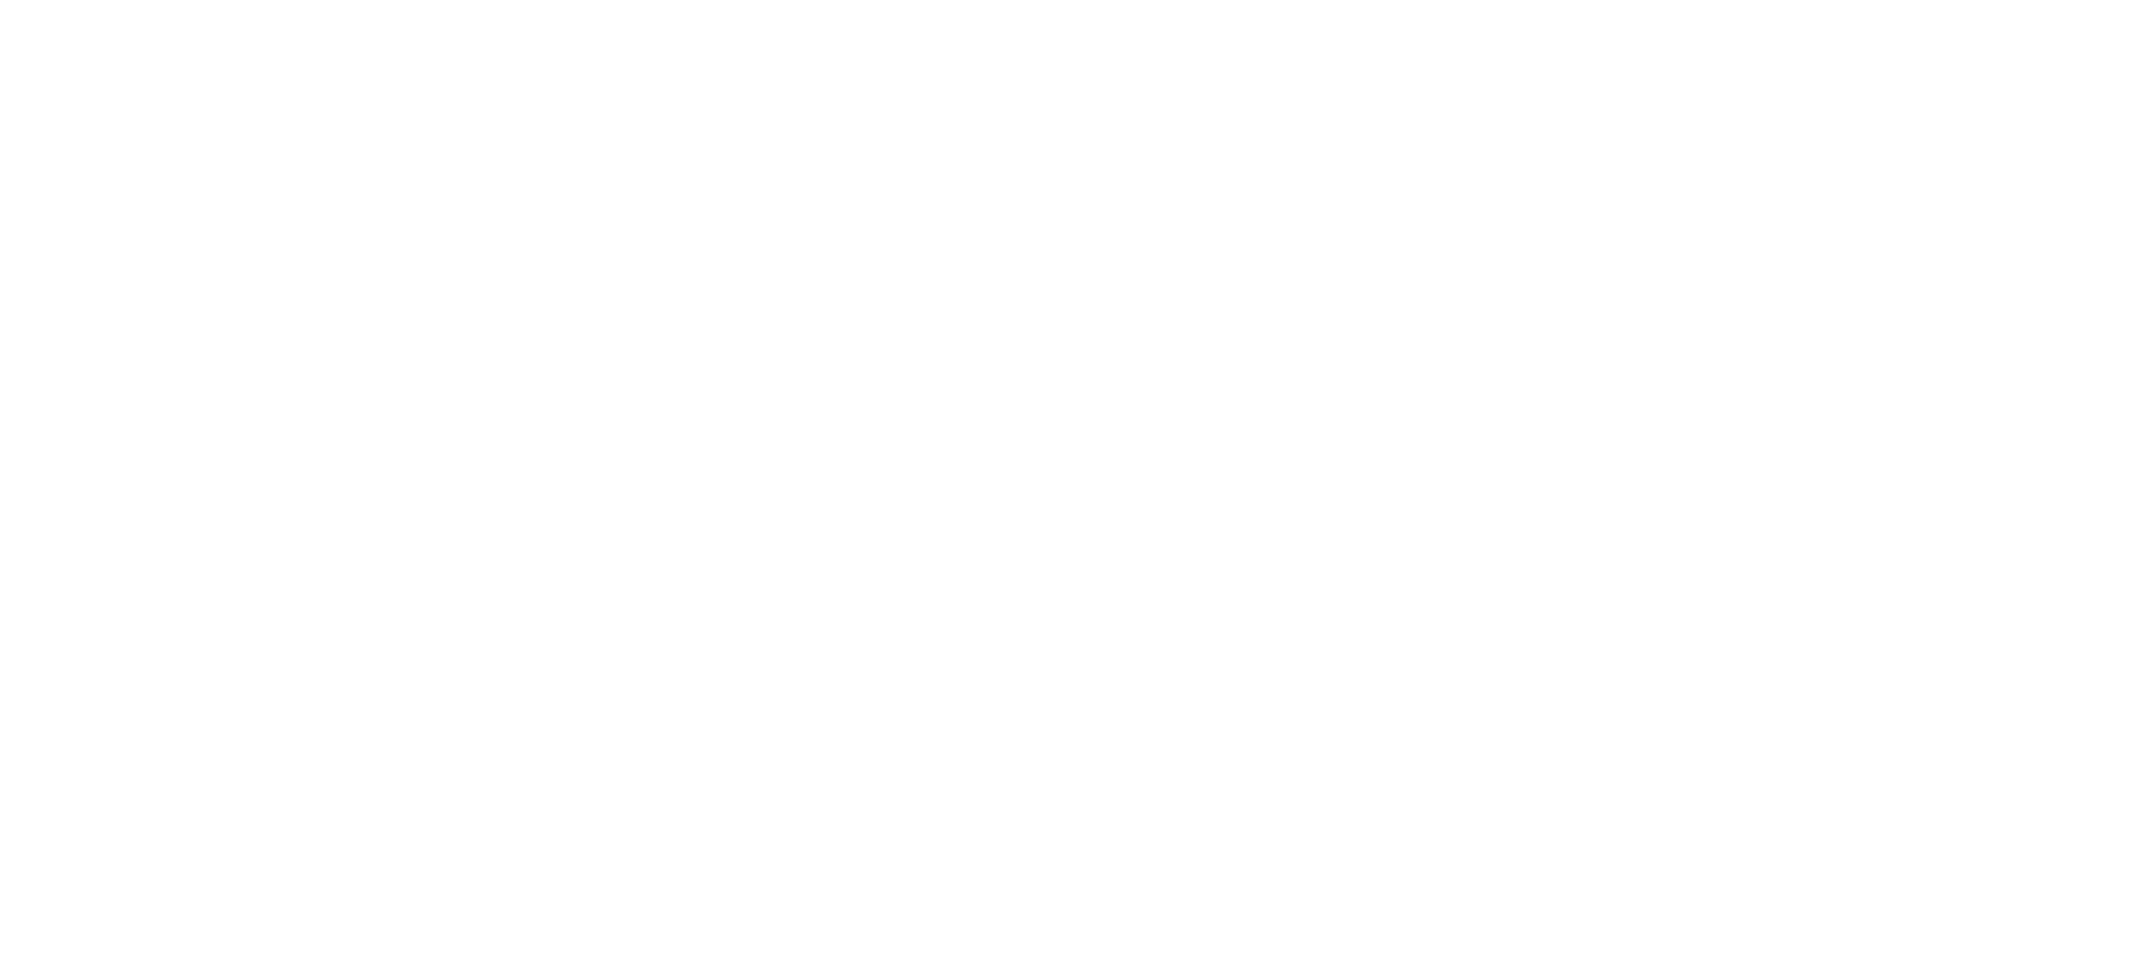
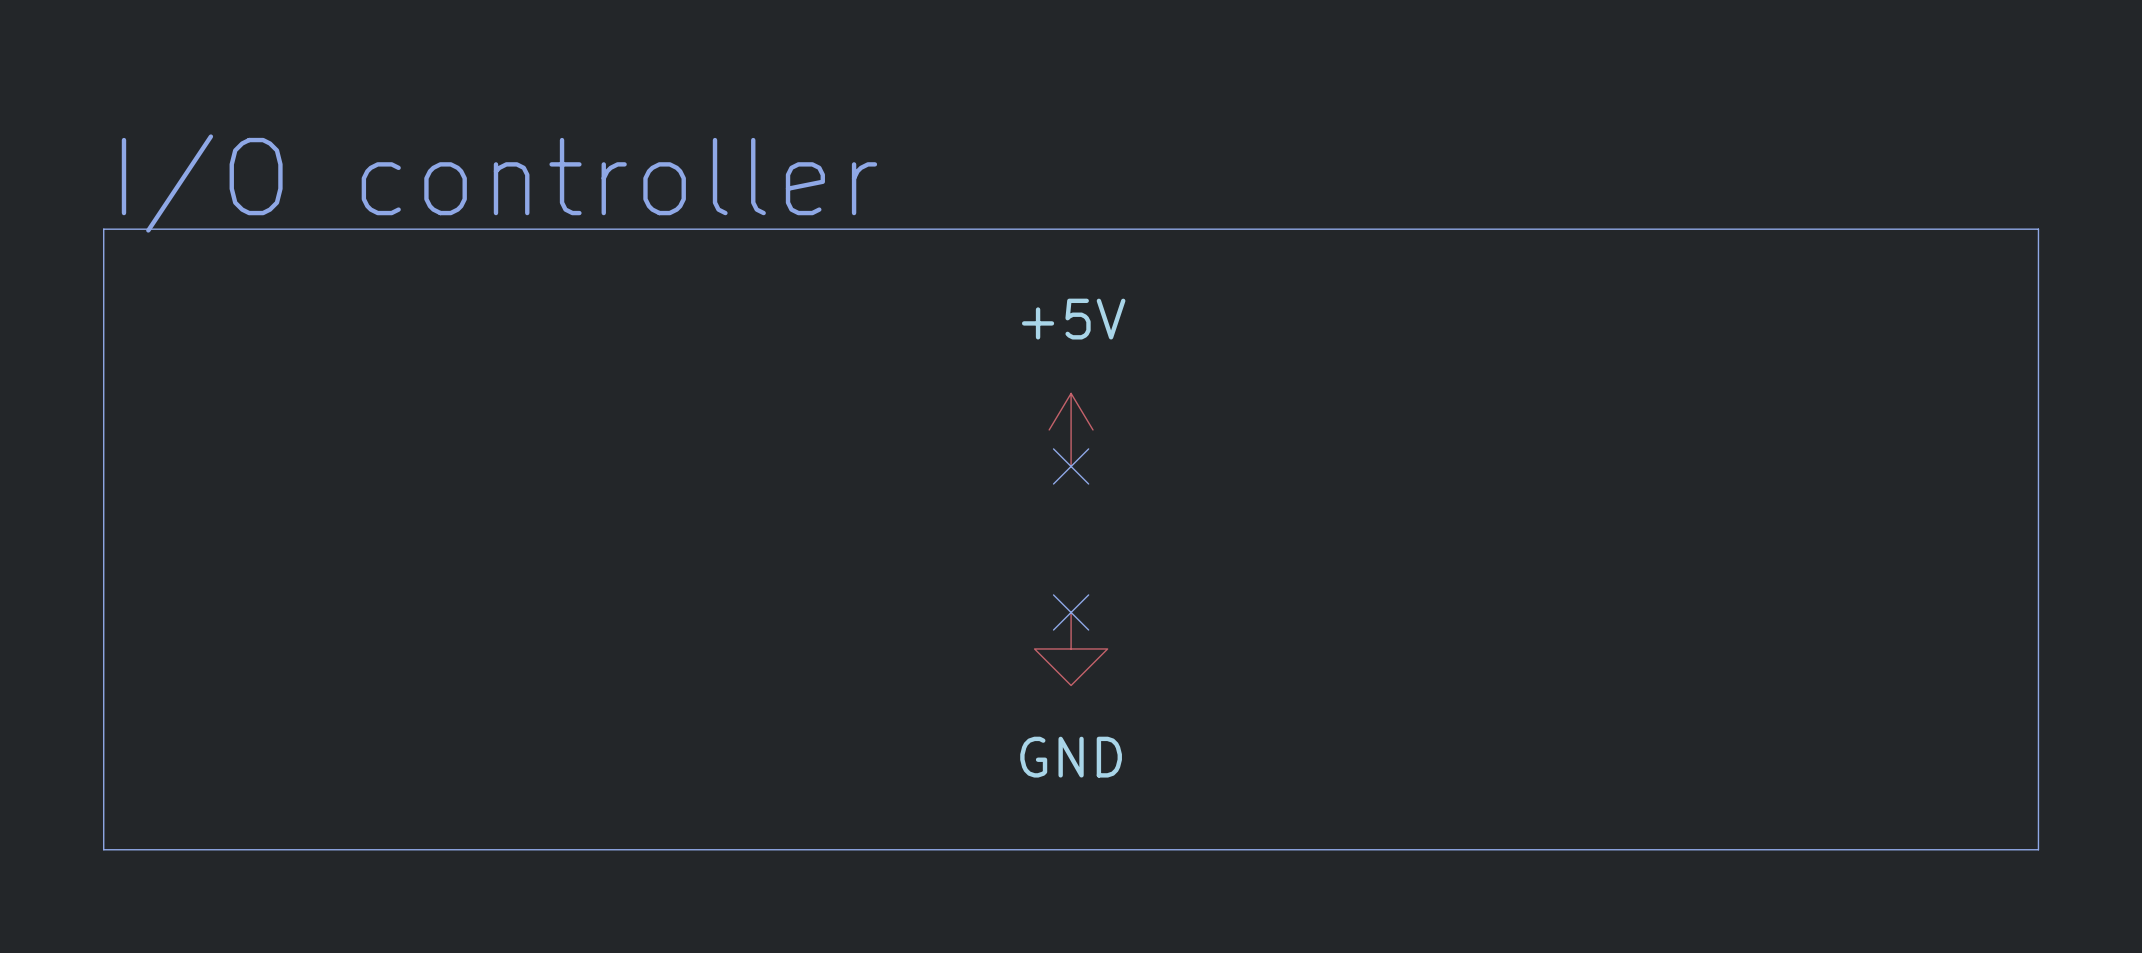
text: none -> I/O controller (499, 183)
line: none -> (103, 229) (2038, 229) (2038, 849) (103, 849) (103, 229)
power symbol: none -> +5V (1071, 429)
no-connect mark: none -> (1071, 466)
no-connect mark: none -> (1071, 612)
power symbol: none -> GND (1071, 648)

